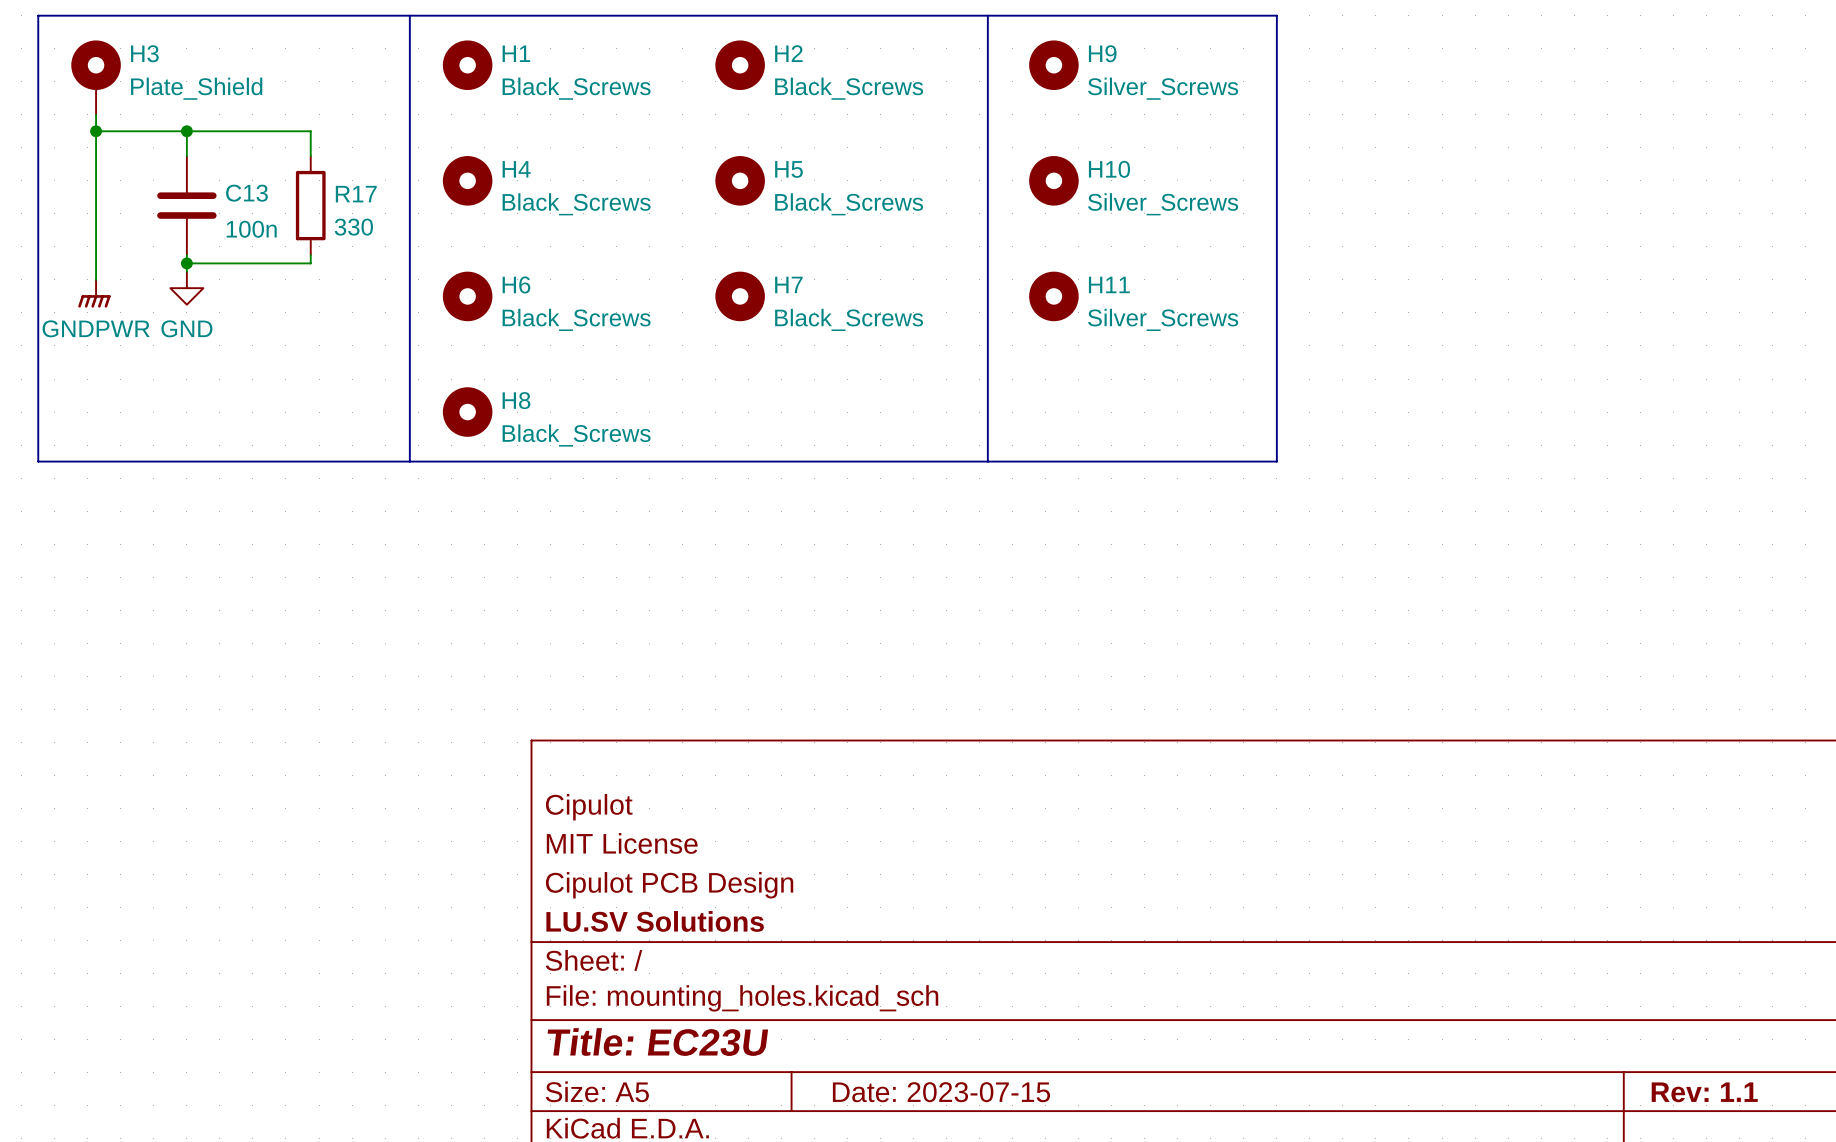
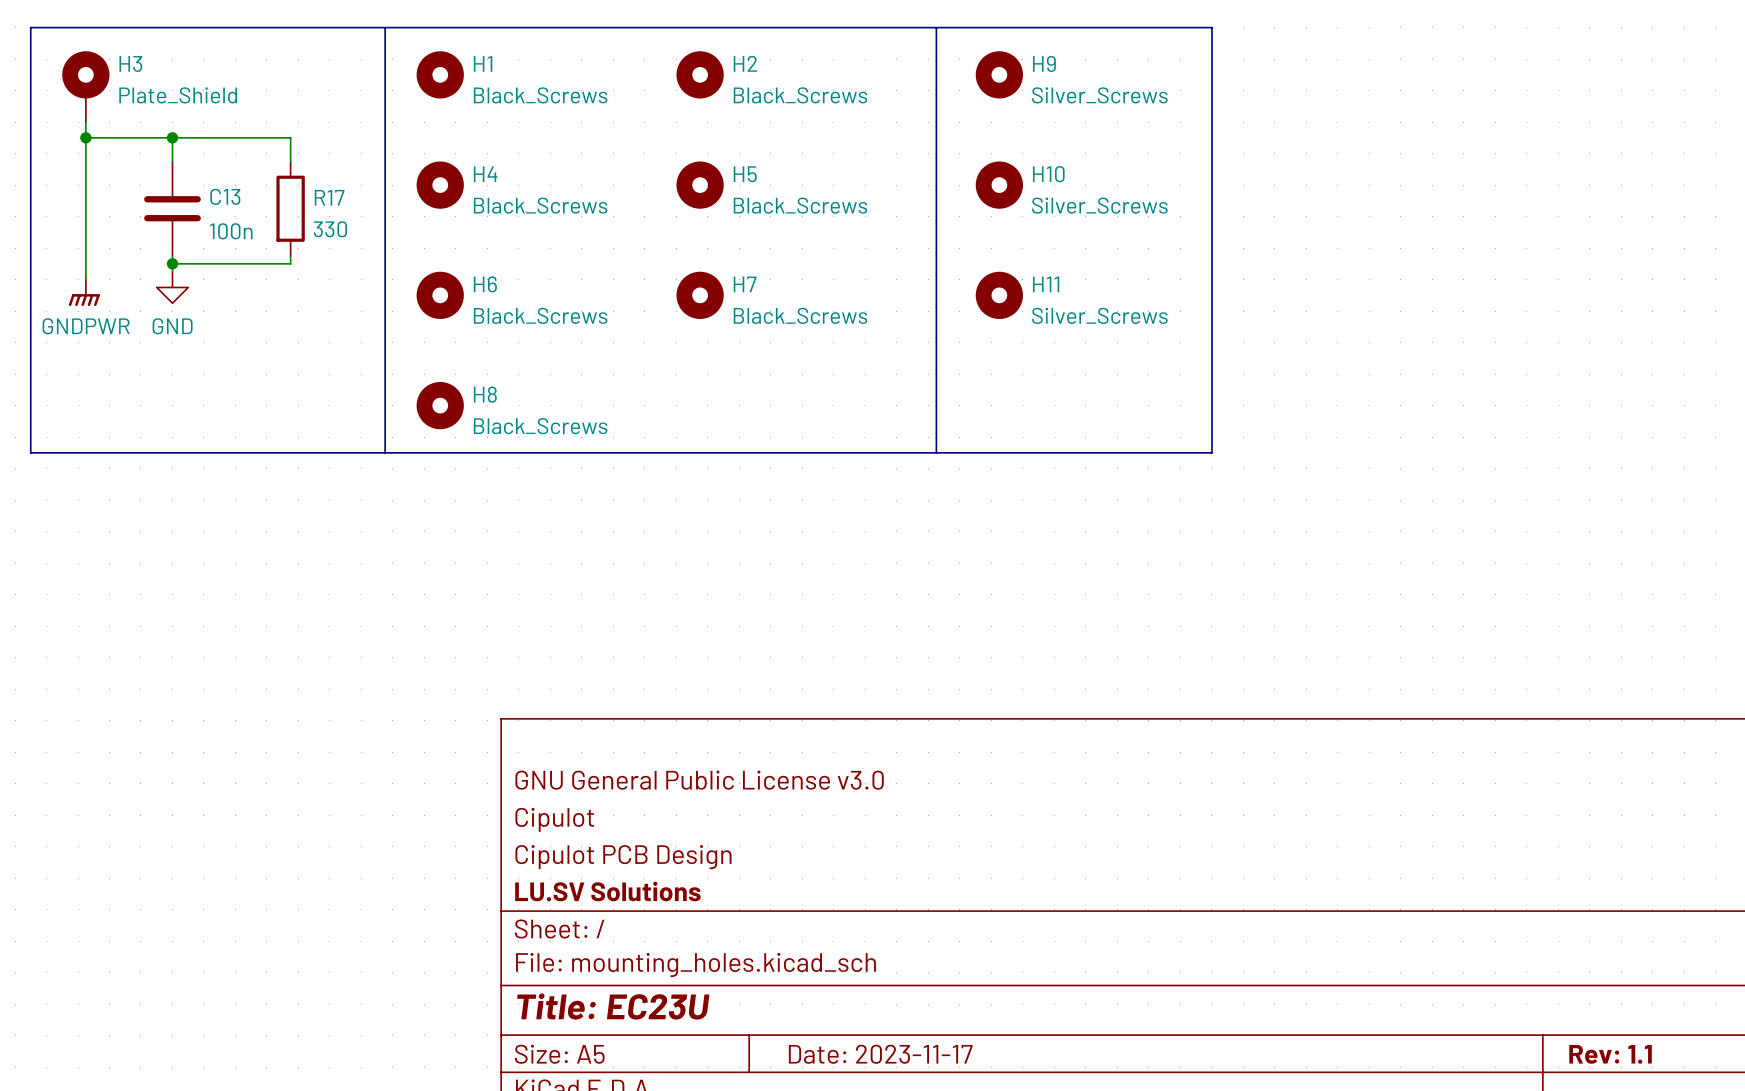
title block: Cipulot (589, 807) -> GNU General Public License v3.0 (699, 780)
title block: MIT License (622, 843) -> Cipulot (554, 819)
title block: Date: 2023-07-15 (941, 1092) -> Date: 2023-11-17 (880, 1054)

